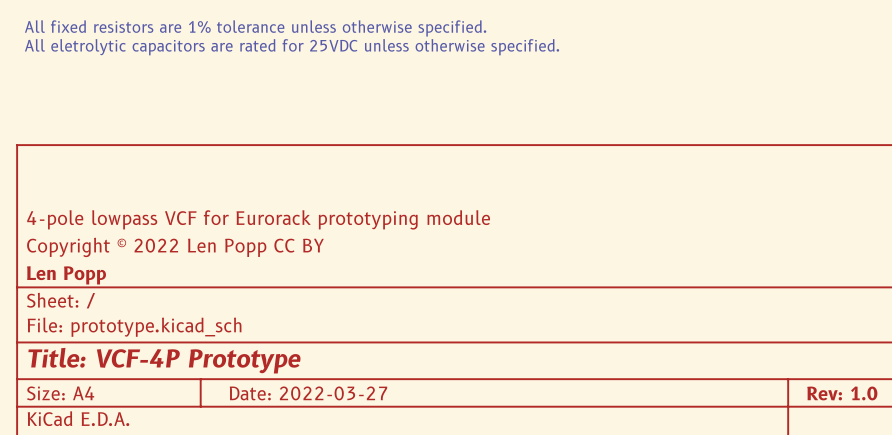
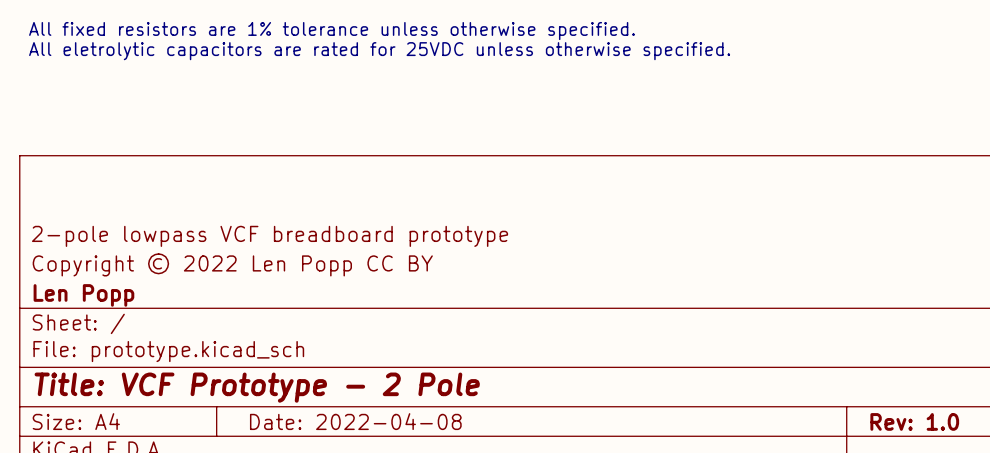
title block: 4-pole lowpass VCF for Eurorack prototyping module (258, 219) -> 2-pole lowpass VCF breadboard prototype (270, 236)
title block: Title: VCF-4P Prototype (164, 360) -> Title: VCF Prototype - 2 Pole (257, 387)
title block: Date: 2022-03-27 (308, 393) -> Date: 2022-04-08 (355, 421)

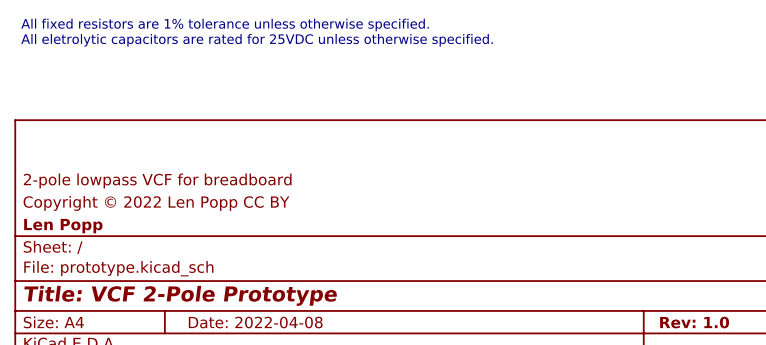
title block: 2-pole lowpass VCF breadboard prototype (270, 236) -> 2-pole lowpass VCF for breadboard (157, 180)
title block: Title: VCF Prototype - 2 Pole (257, 387) -> Title: VCF 2-Pole Prototype (180, 295)

